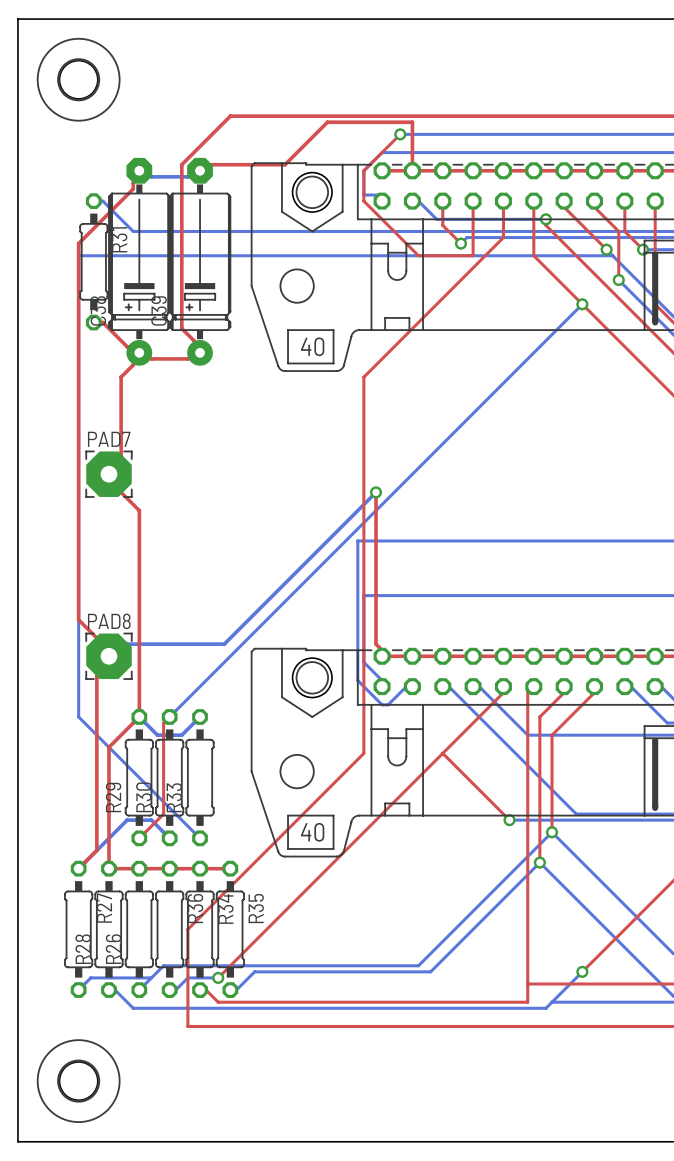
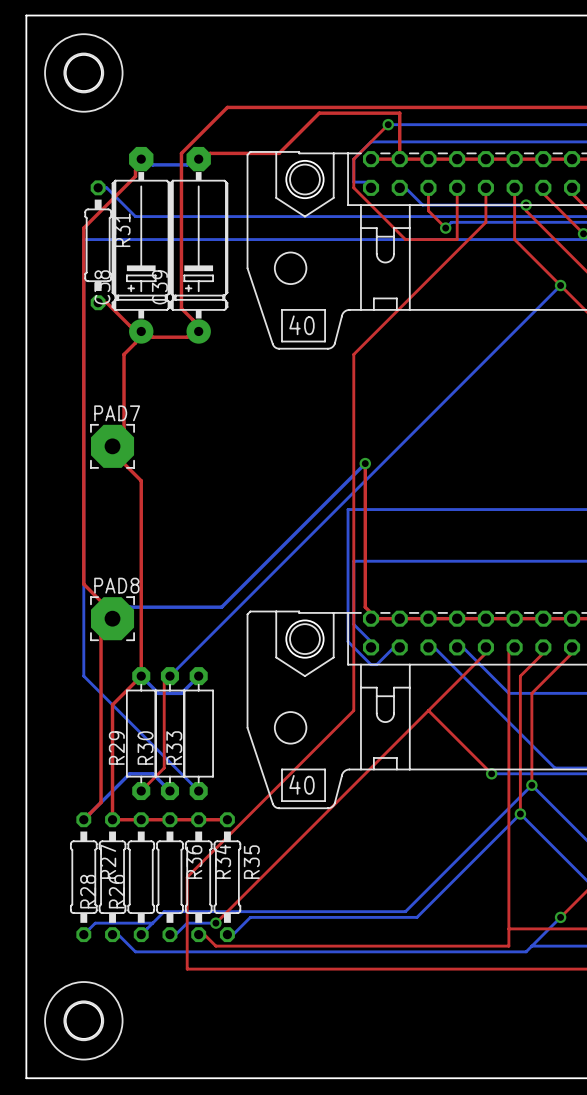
R29 footprint: [124, 709, 154, 847] -> [126, 667, 157, 801]
R30 footprint: [155, 709, 185, 847] -> [154, 667, 186, 801]
R33 footprint: [185, 709, 215, 847] -> [183, 667, 214, 801]

